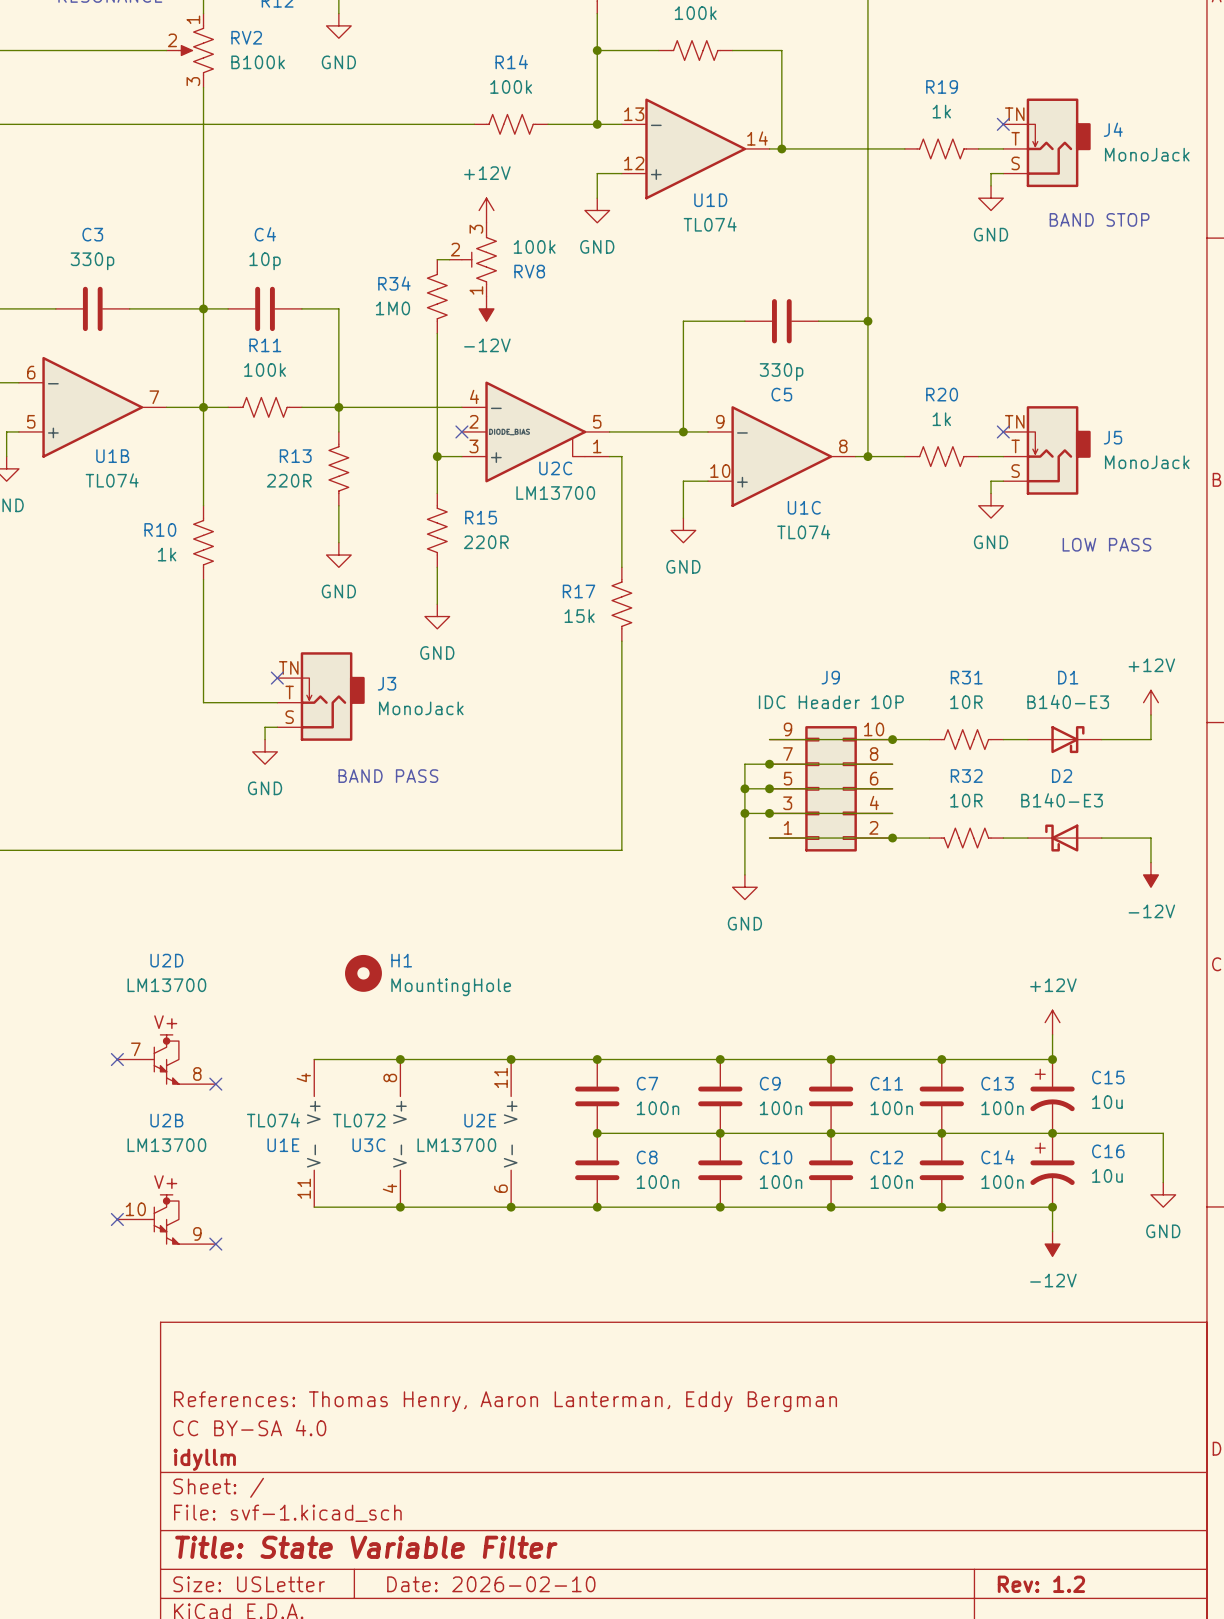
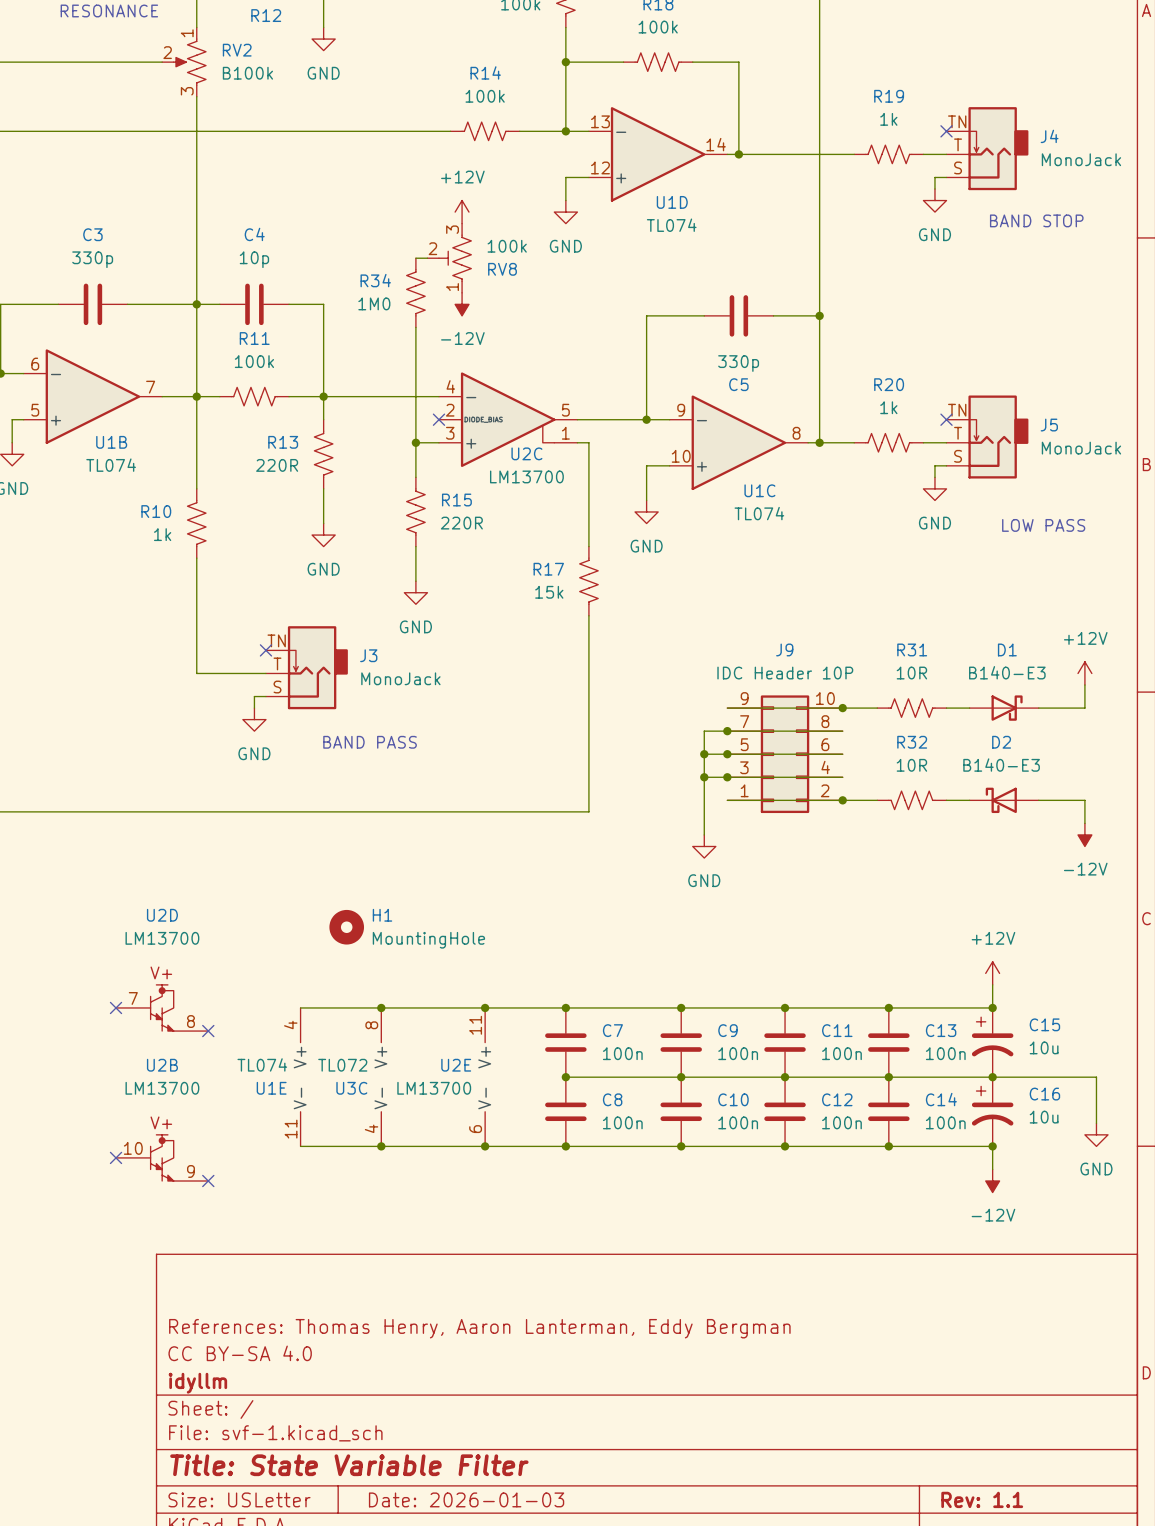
title block: Date: 2026-02-10 (491, 1584) -> Date: 2026-01-03 (466, 1499)
title block: Rev: 1.2 (1041, 1584) -> Rev: 1.1 (982, 1499)

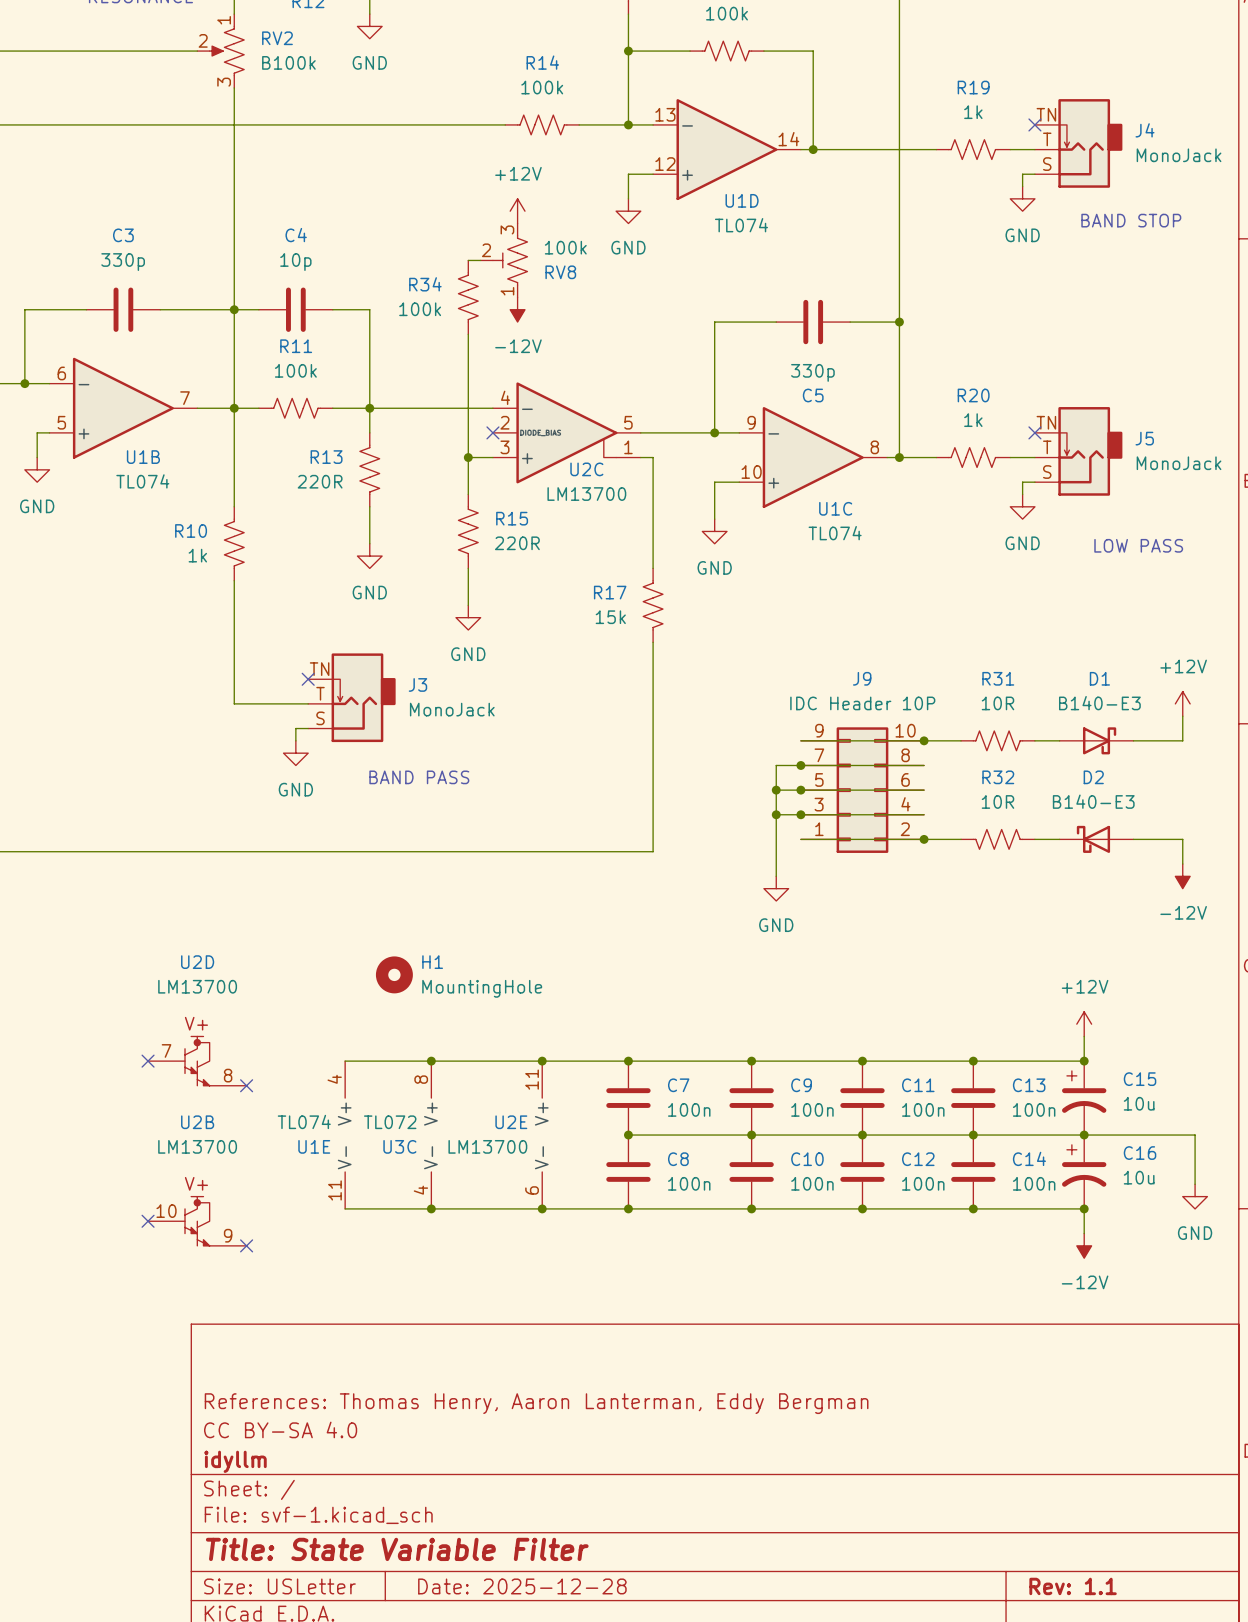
R34 value: 1M0 (374, 303) -> 100k (420, 309)
title block: Date: 2026-01-03 (466, 1499) -> Date: 2025-12-28 (522, 1586)

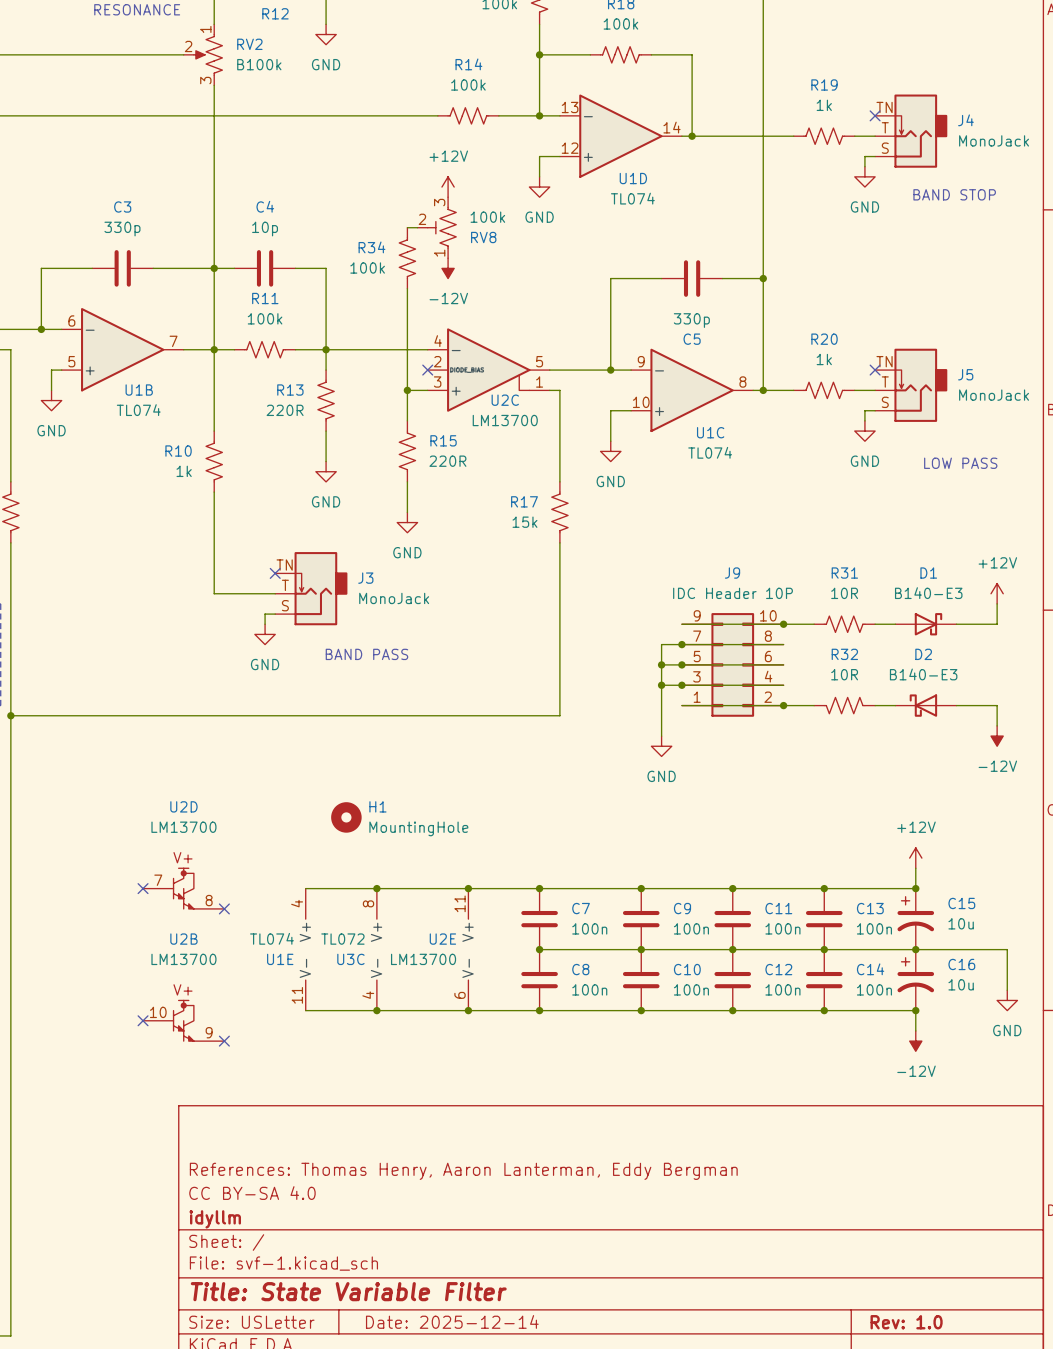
title block: Date: 2025-12-28 (522, 1586) -> Date: 2025-12-14 (452, 1321)
title block: Rev: 1.1 (1073, 1586) -> Rev: 1.0 (906, 1322)

